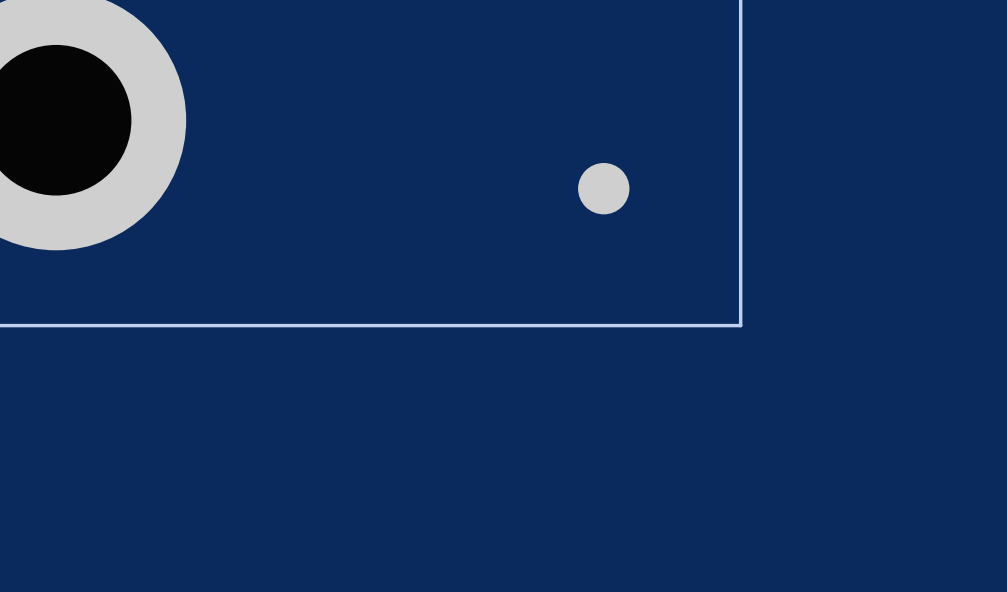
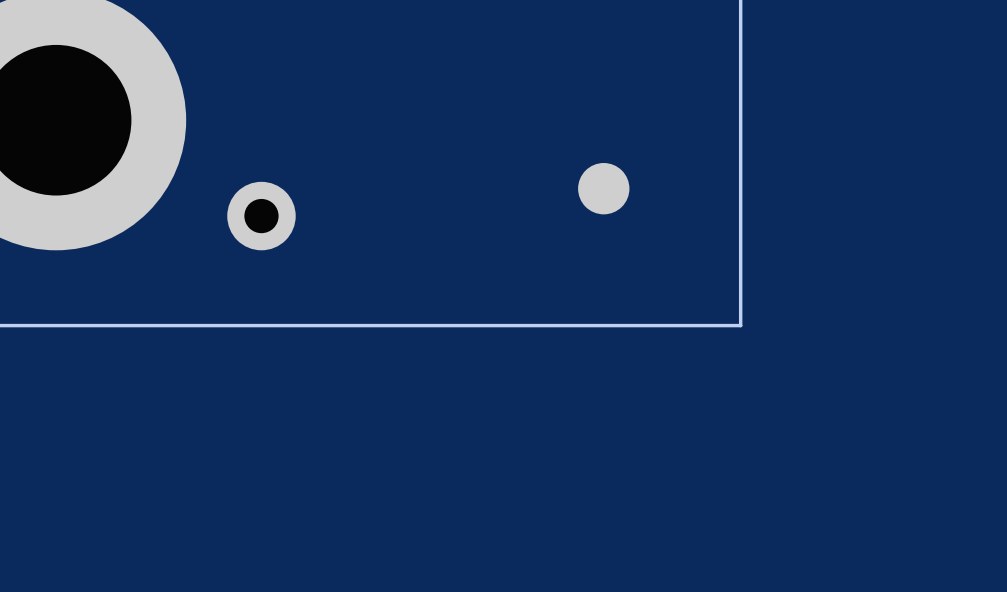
part: none -> (261, 216)

